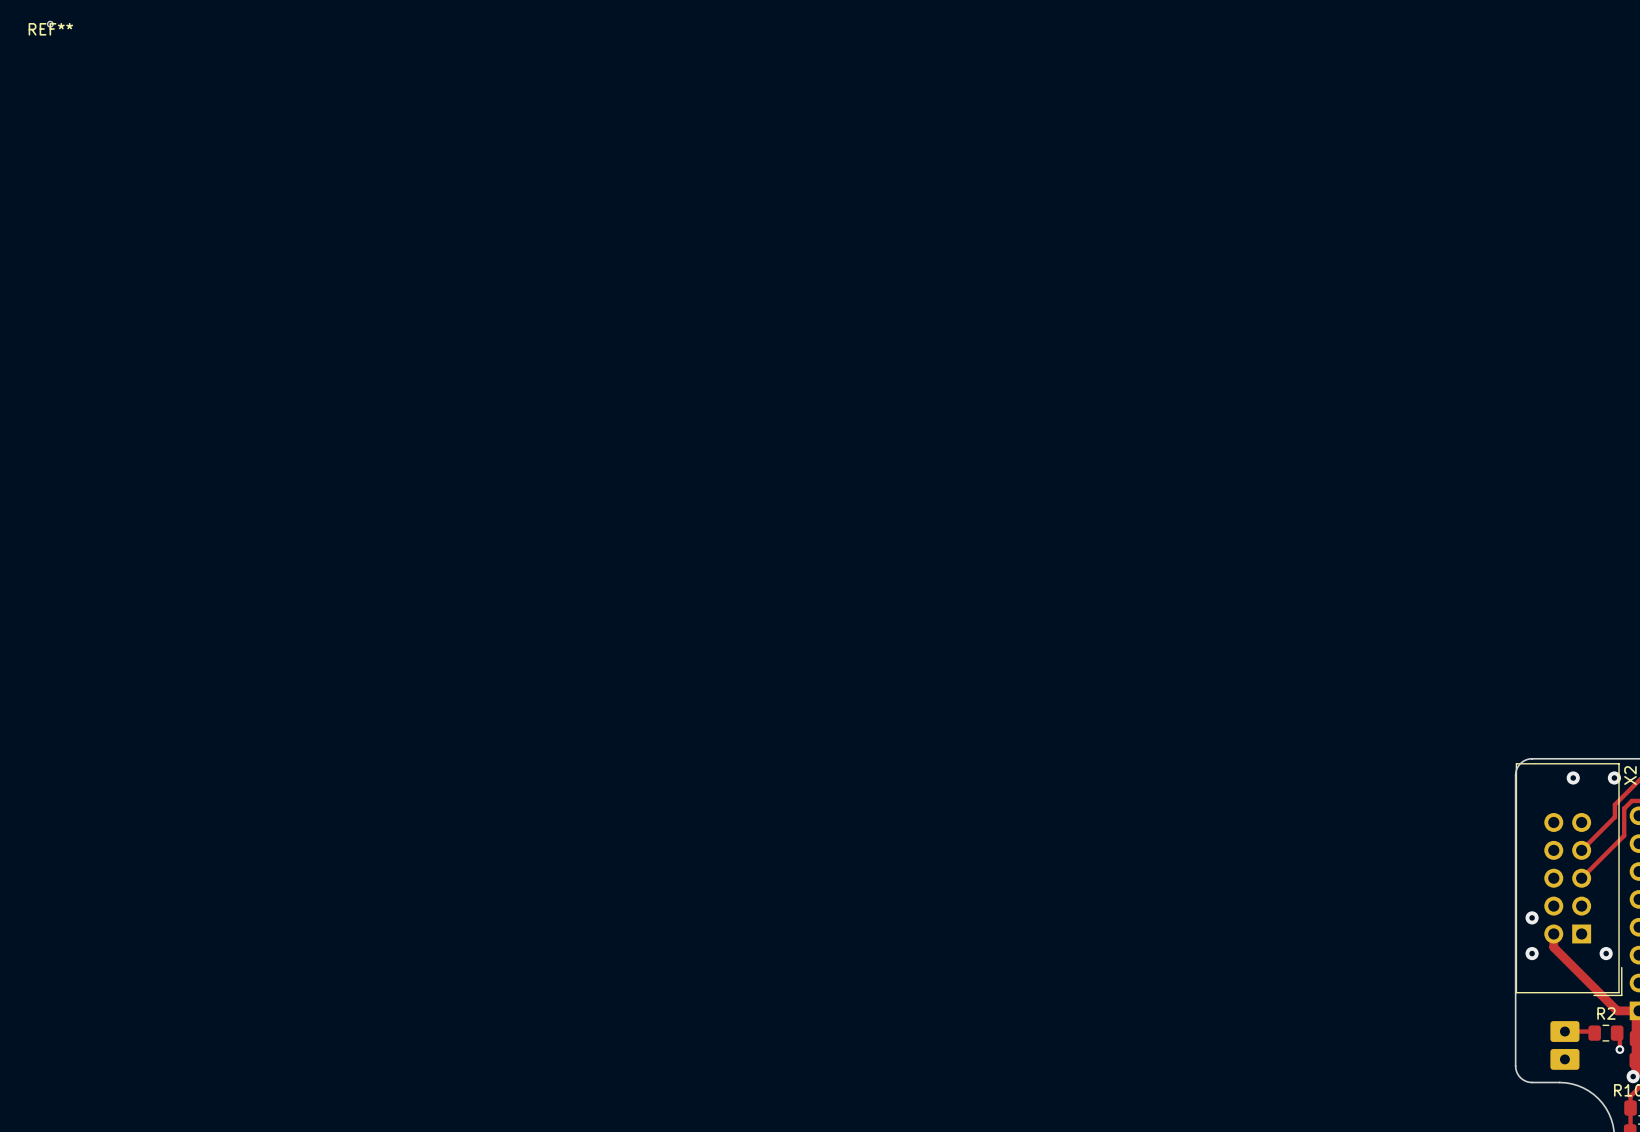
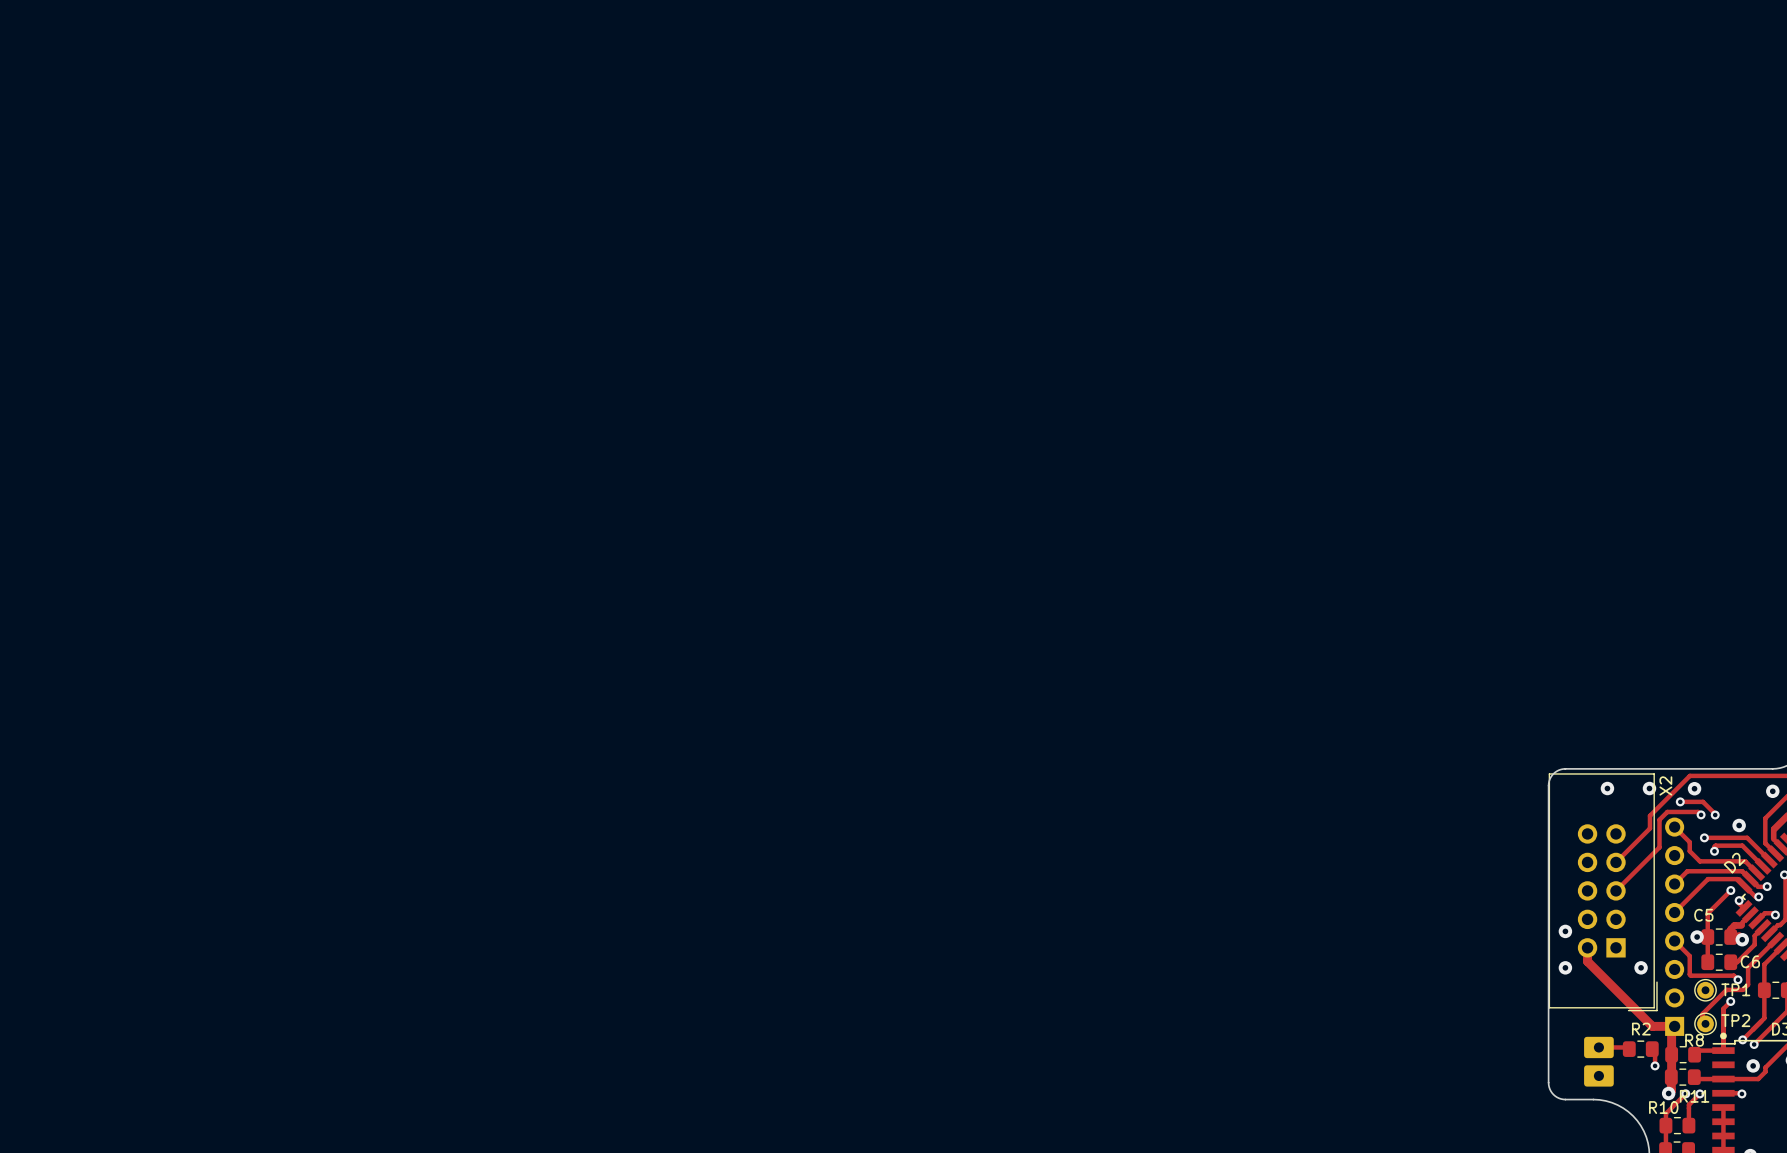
REF**: (50, 24) -> none

